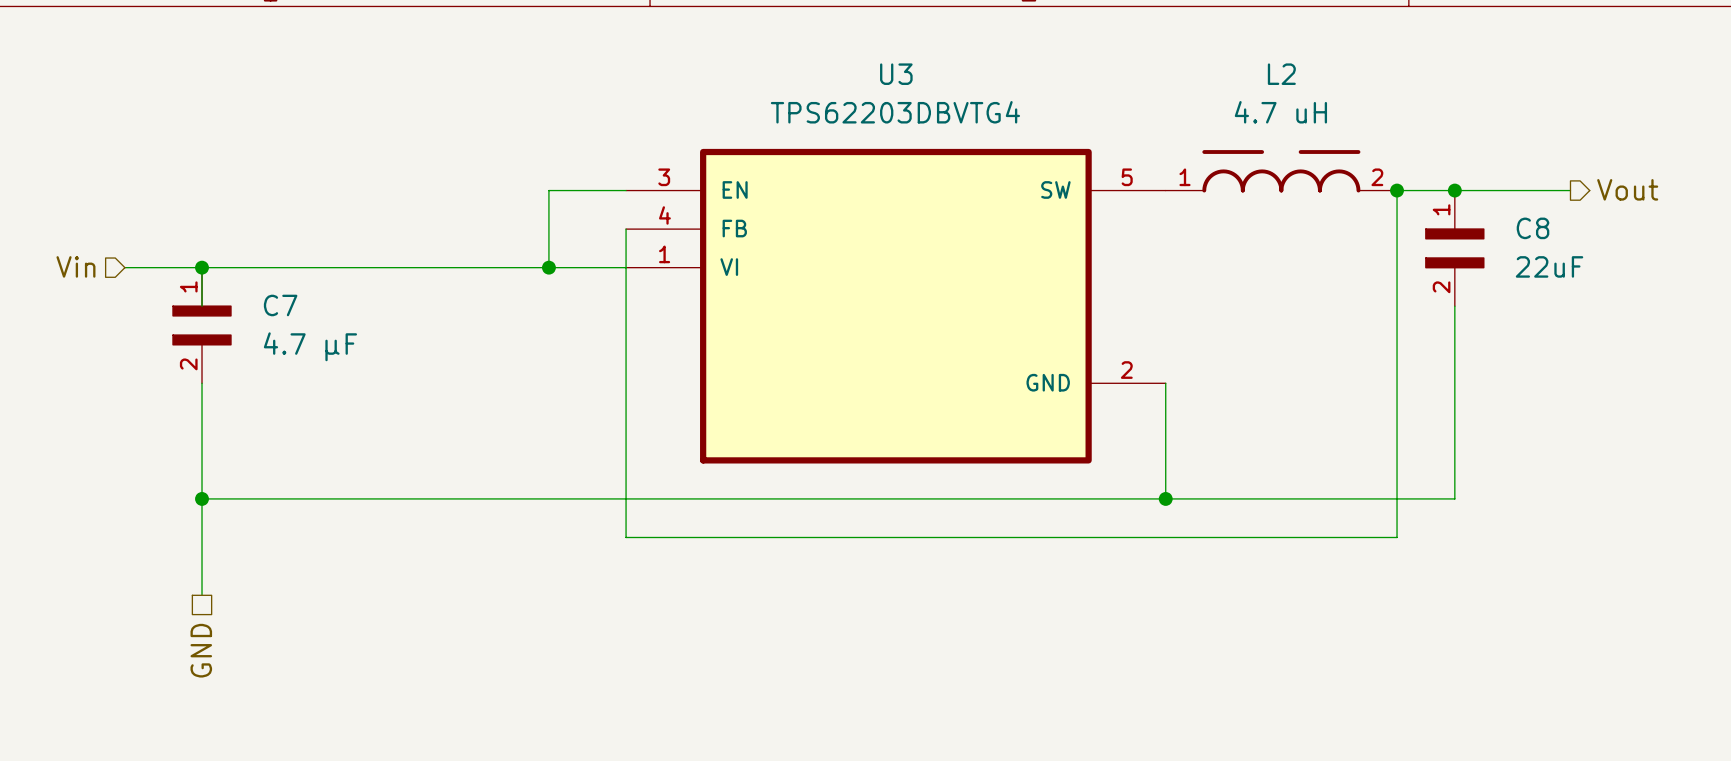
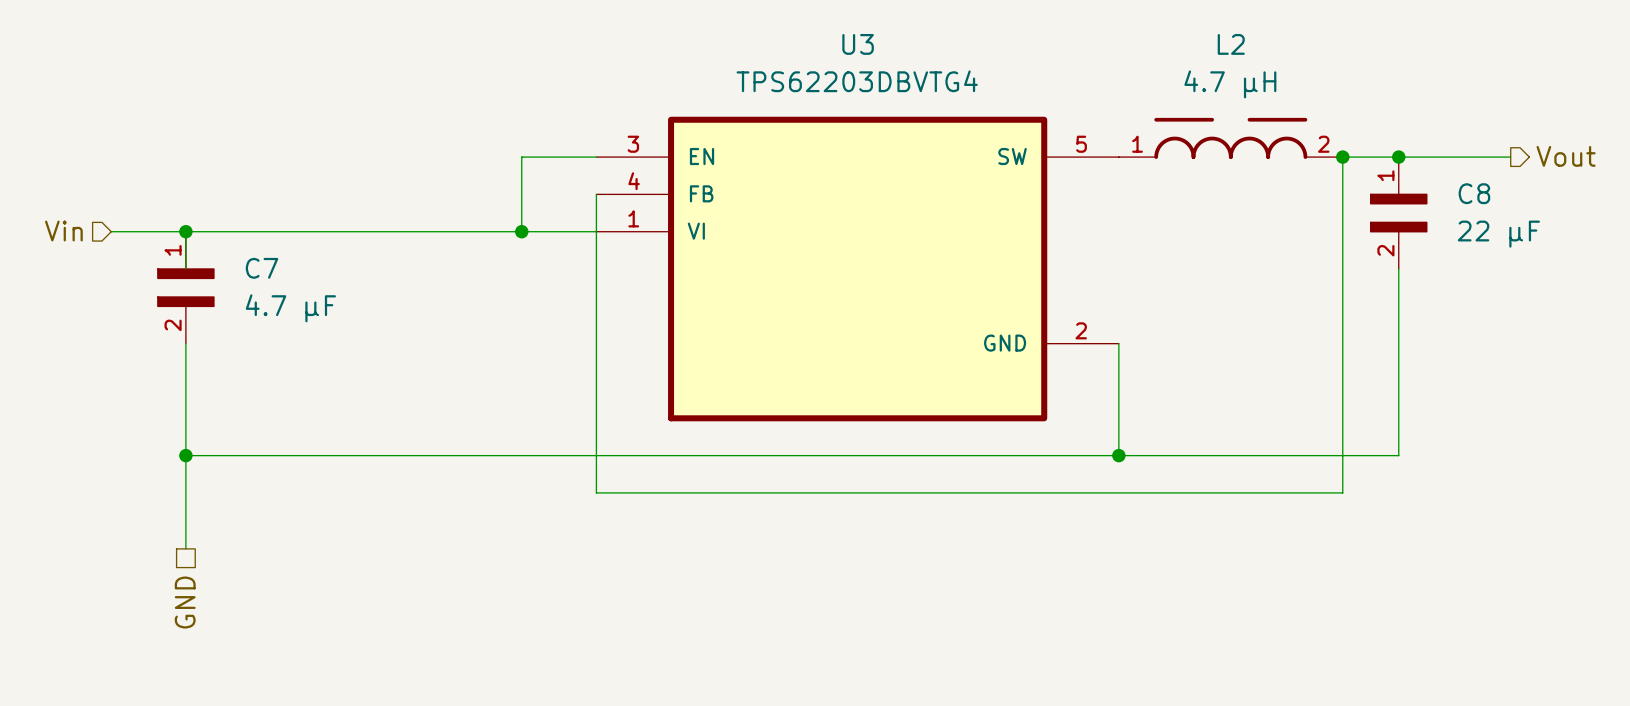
L2 value: 4.7 uH (1280, 112) -> 4.7 µH (1230, 84)
C8 value: 22uF (1549, 266) -> 22 µF (1498, 234)

